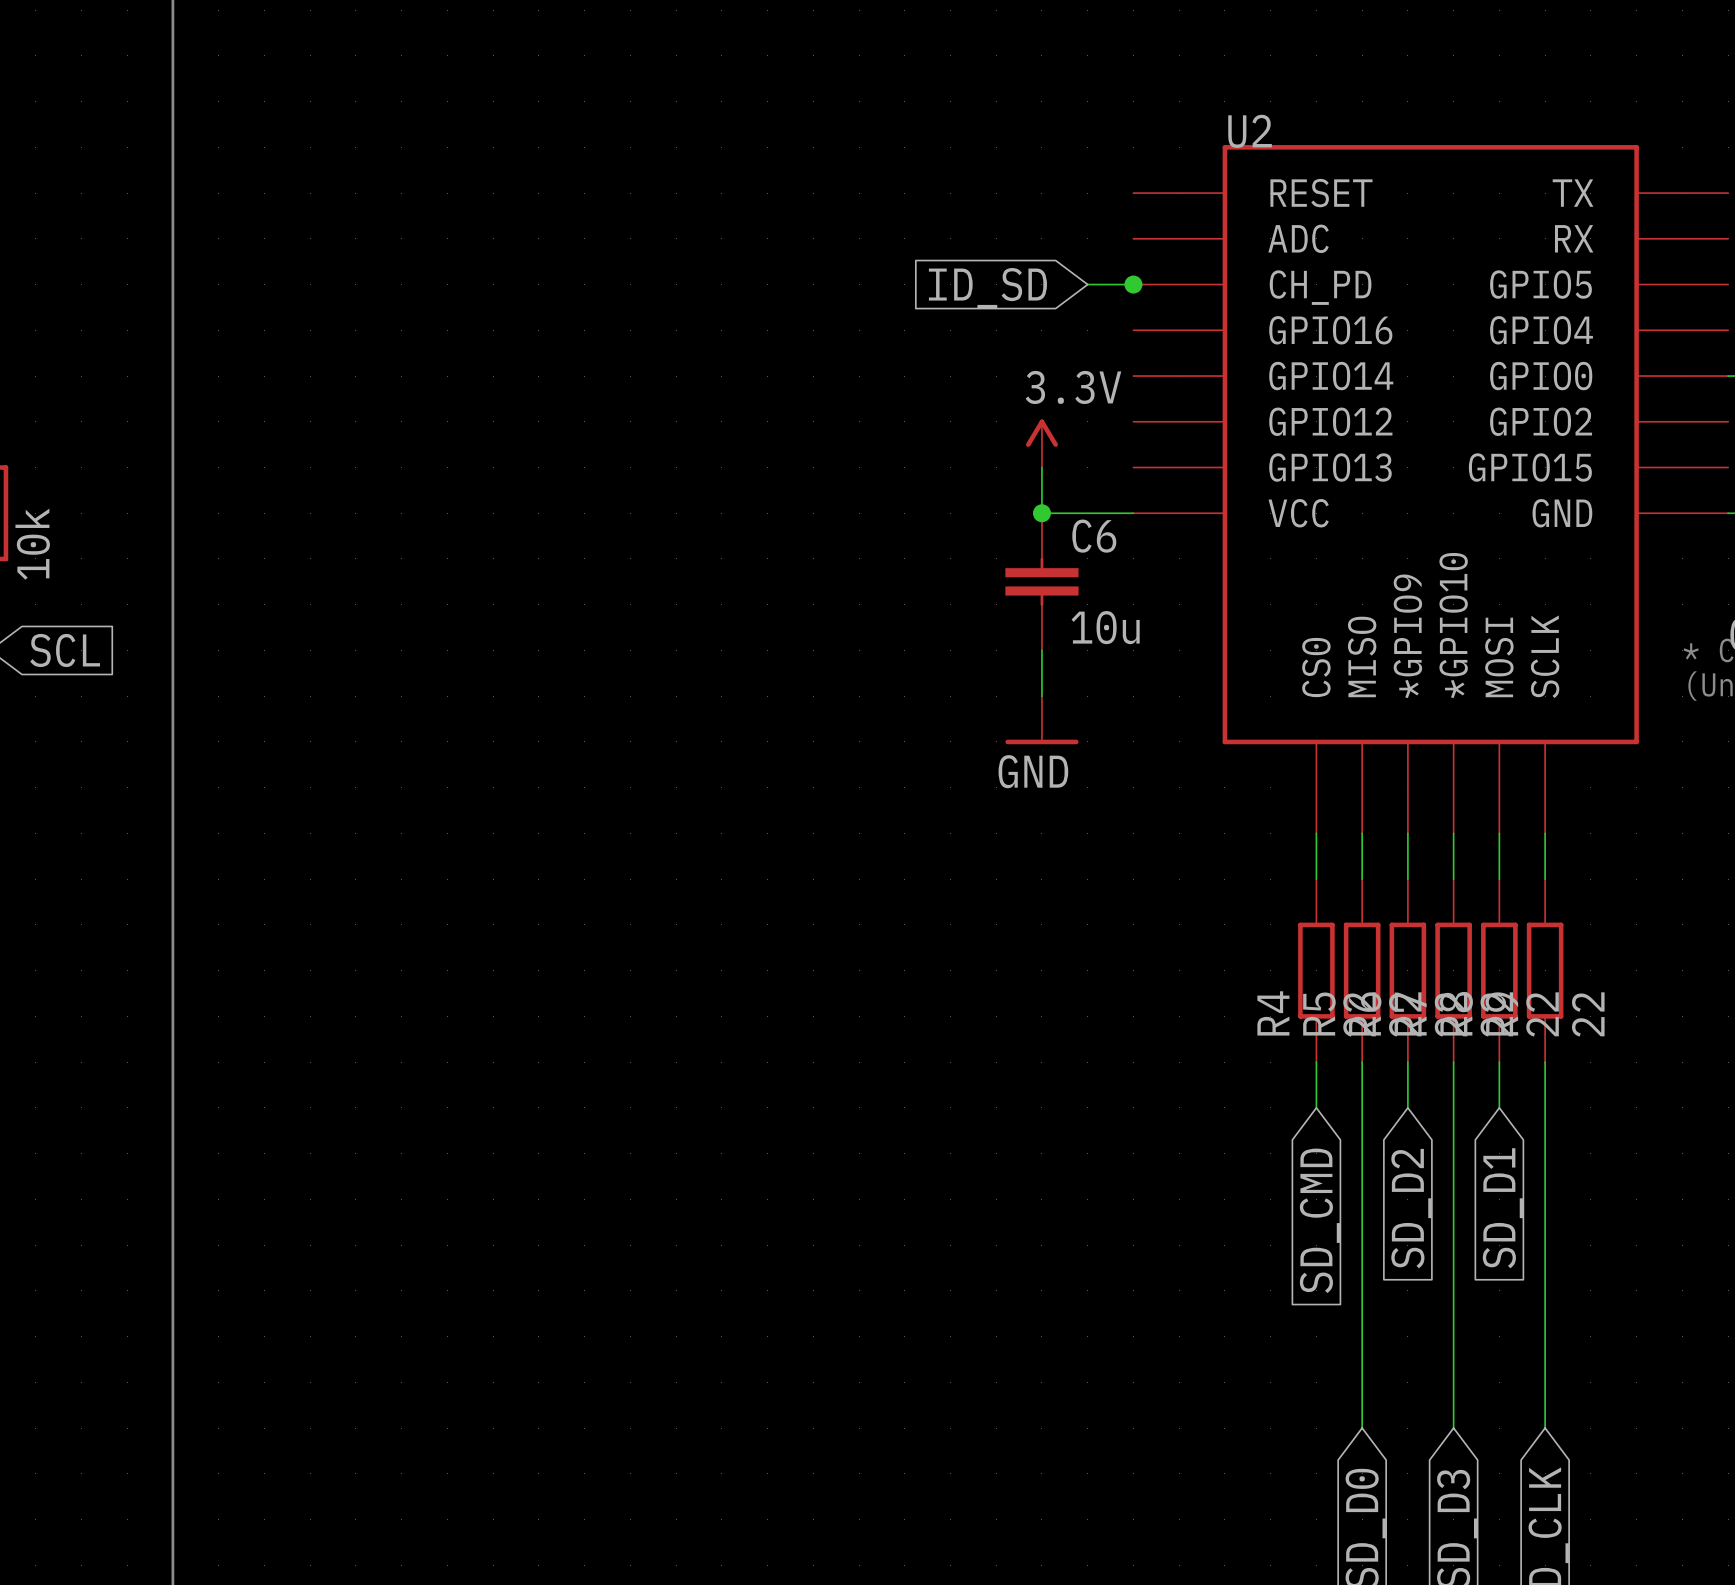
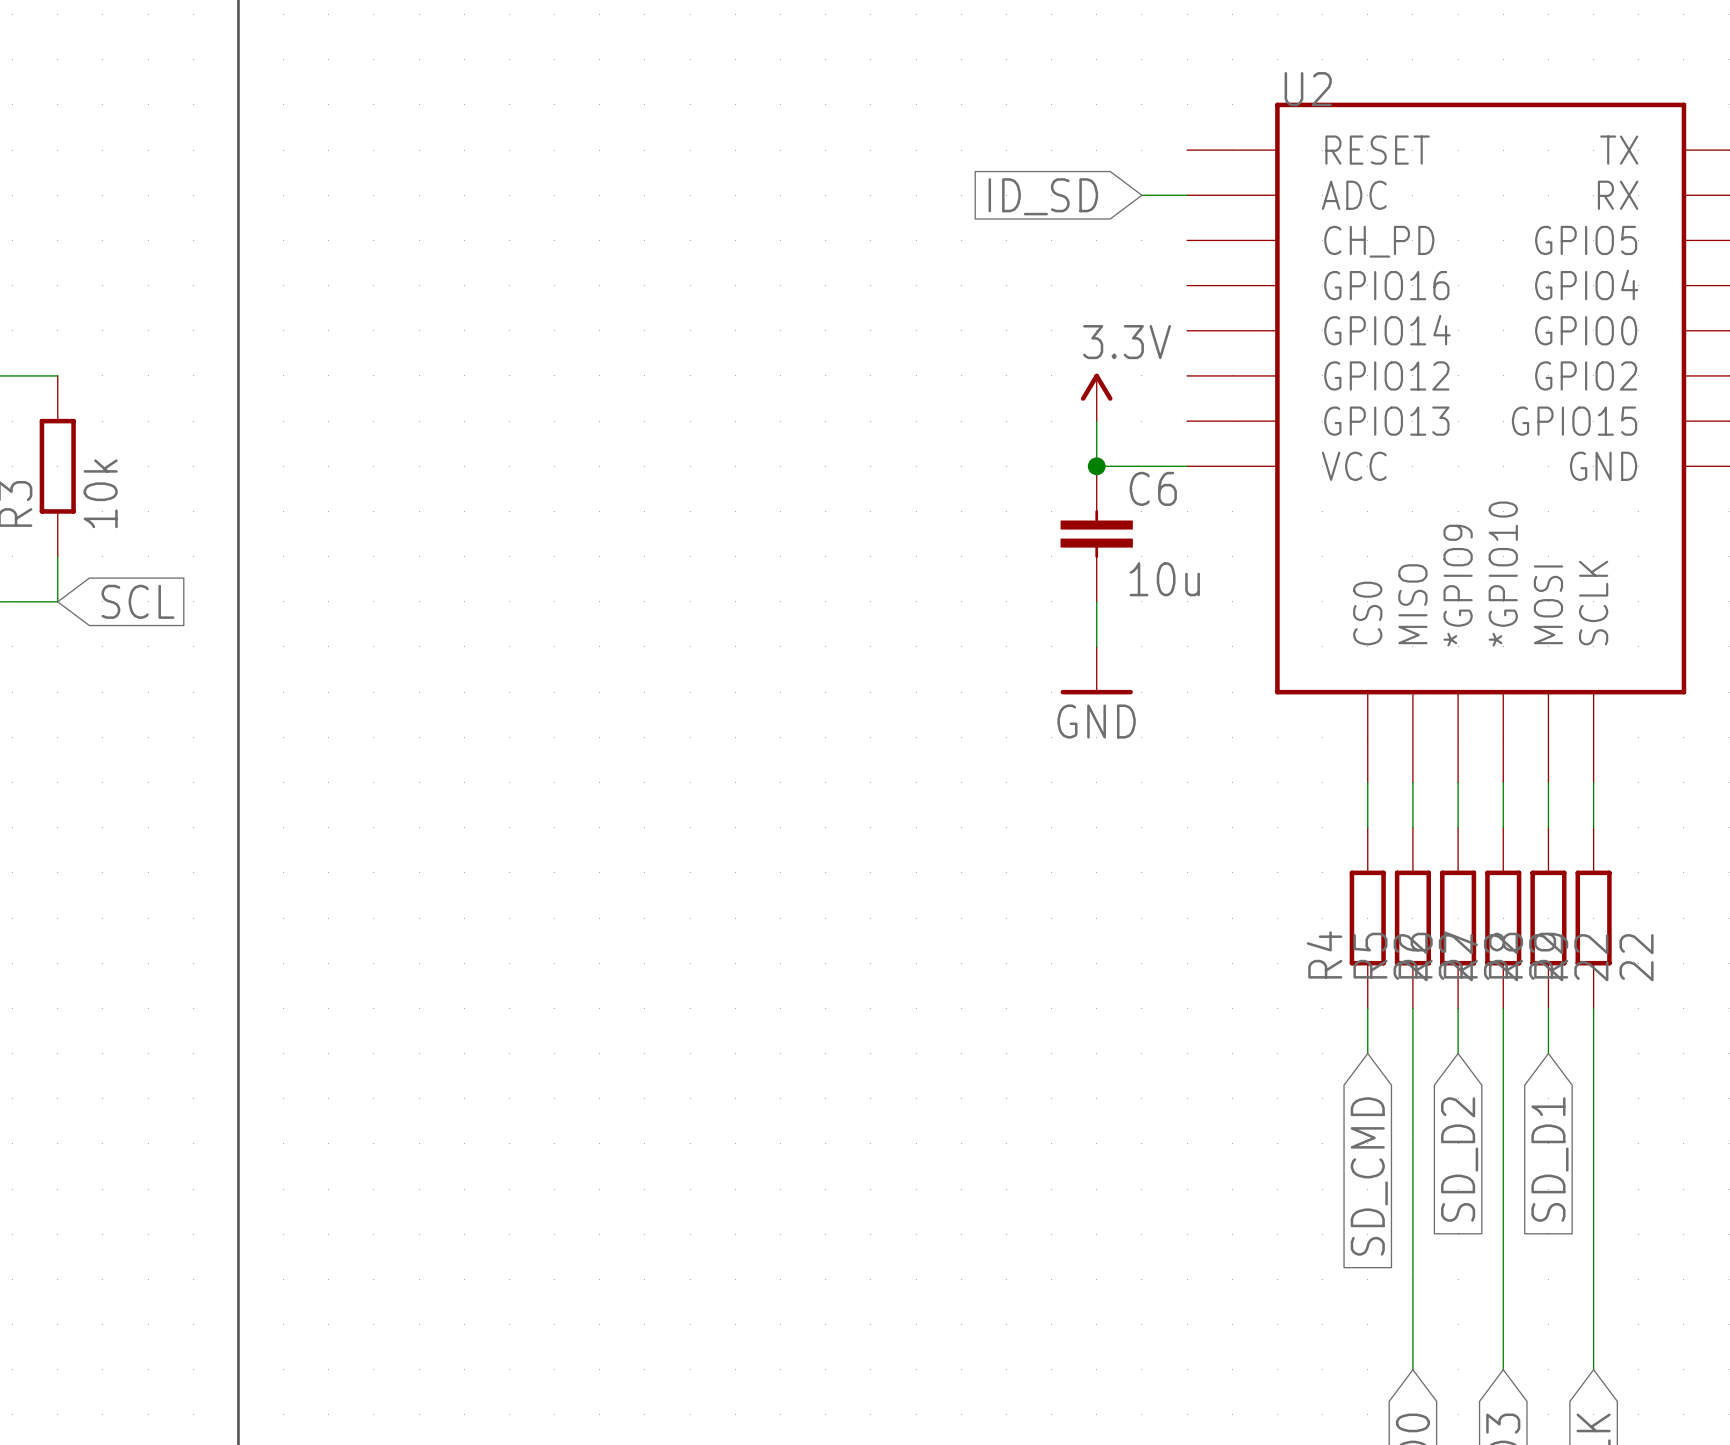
wire: (1087, 284) (1133, 284) -> (1141, 195) (1187, 195)
junction: (1133, 284) -> none
global label position: ID_SD (987, 288) -> ID_SD (1043, 196)

